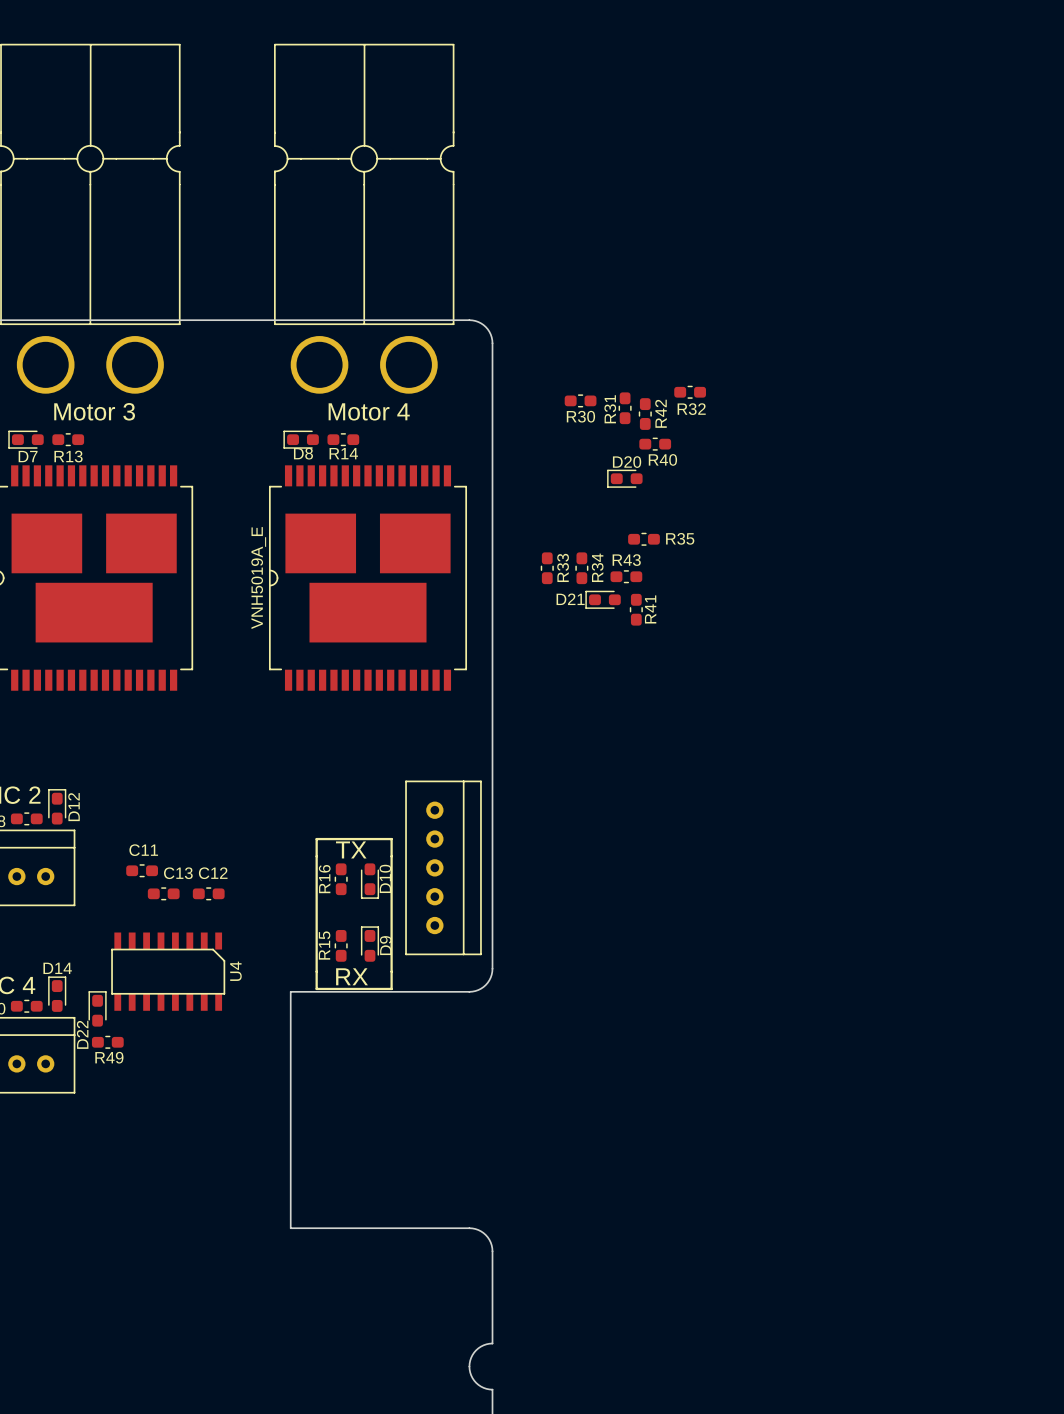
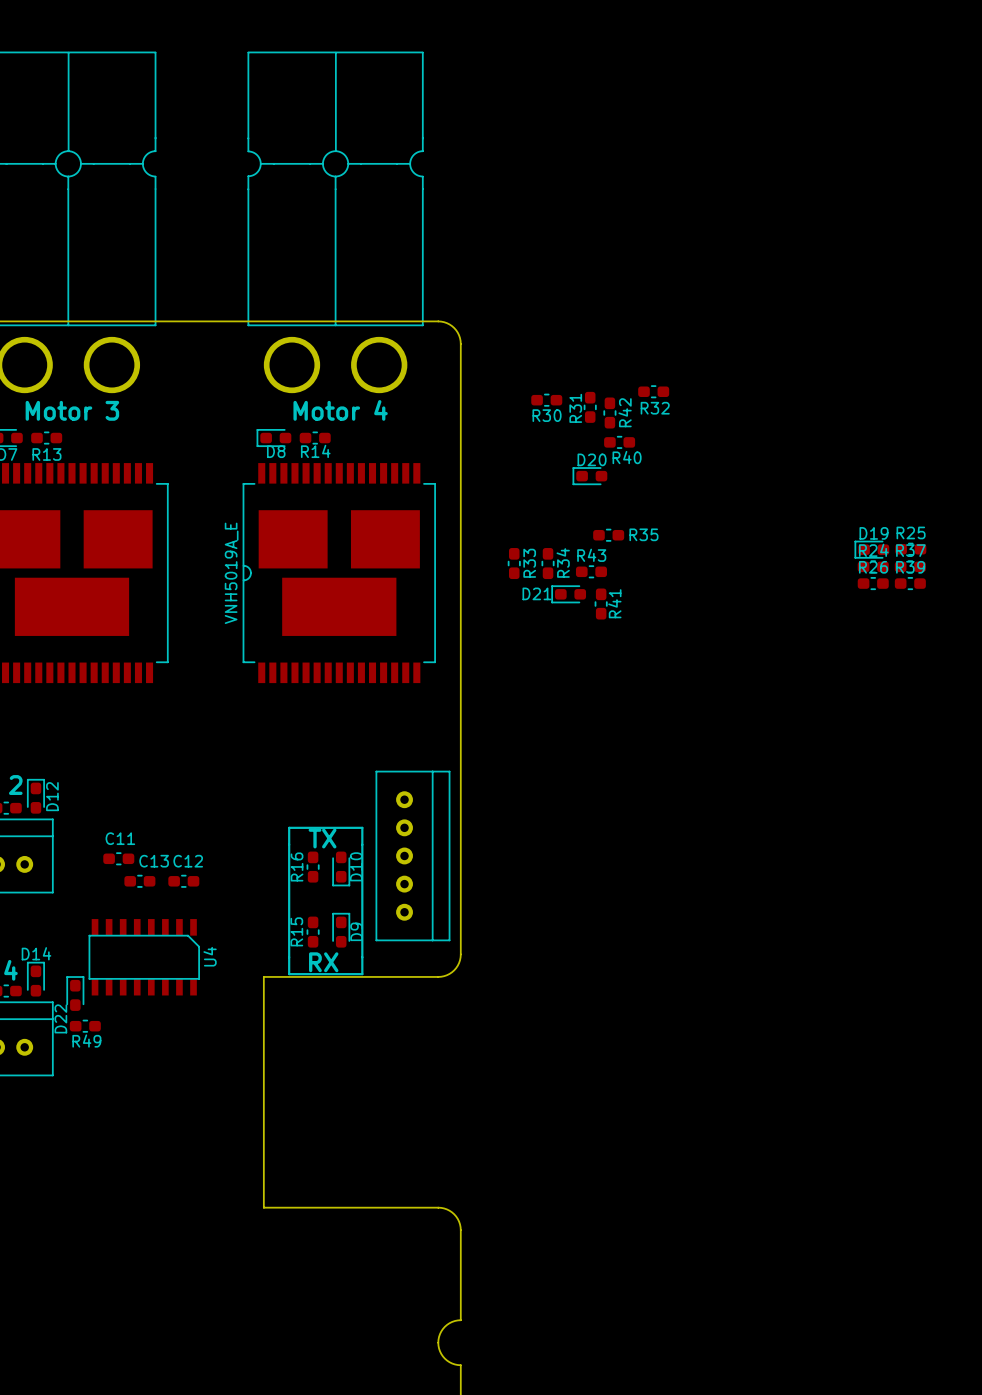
R25: none -> (910, 549)
D19: none -> (871, 549)
R24: none -> (873, 566)
R37: none -> (910, 566)
R26: none -> (873, 583)
R39: none -> (910, 583)

